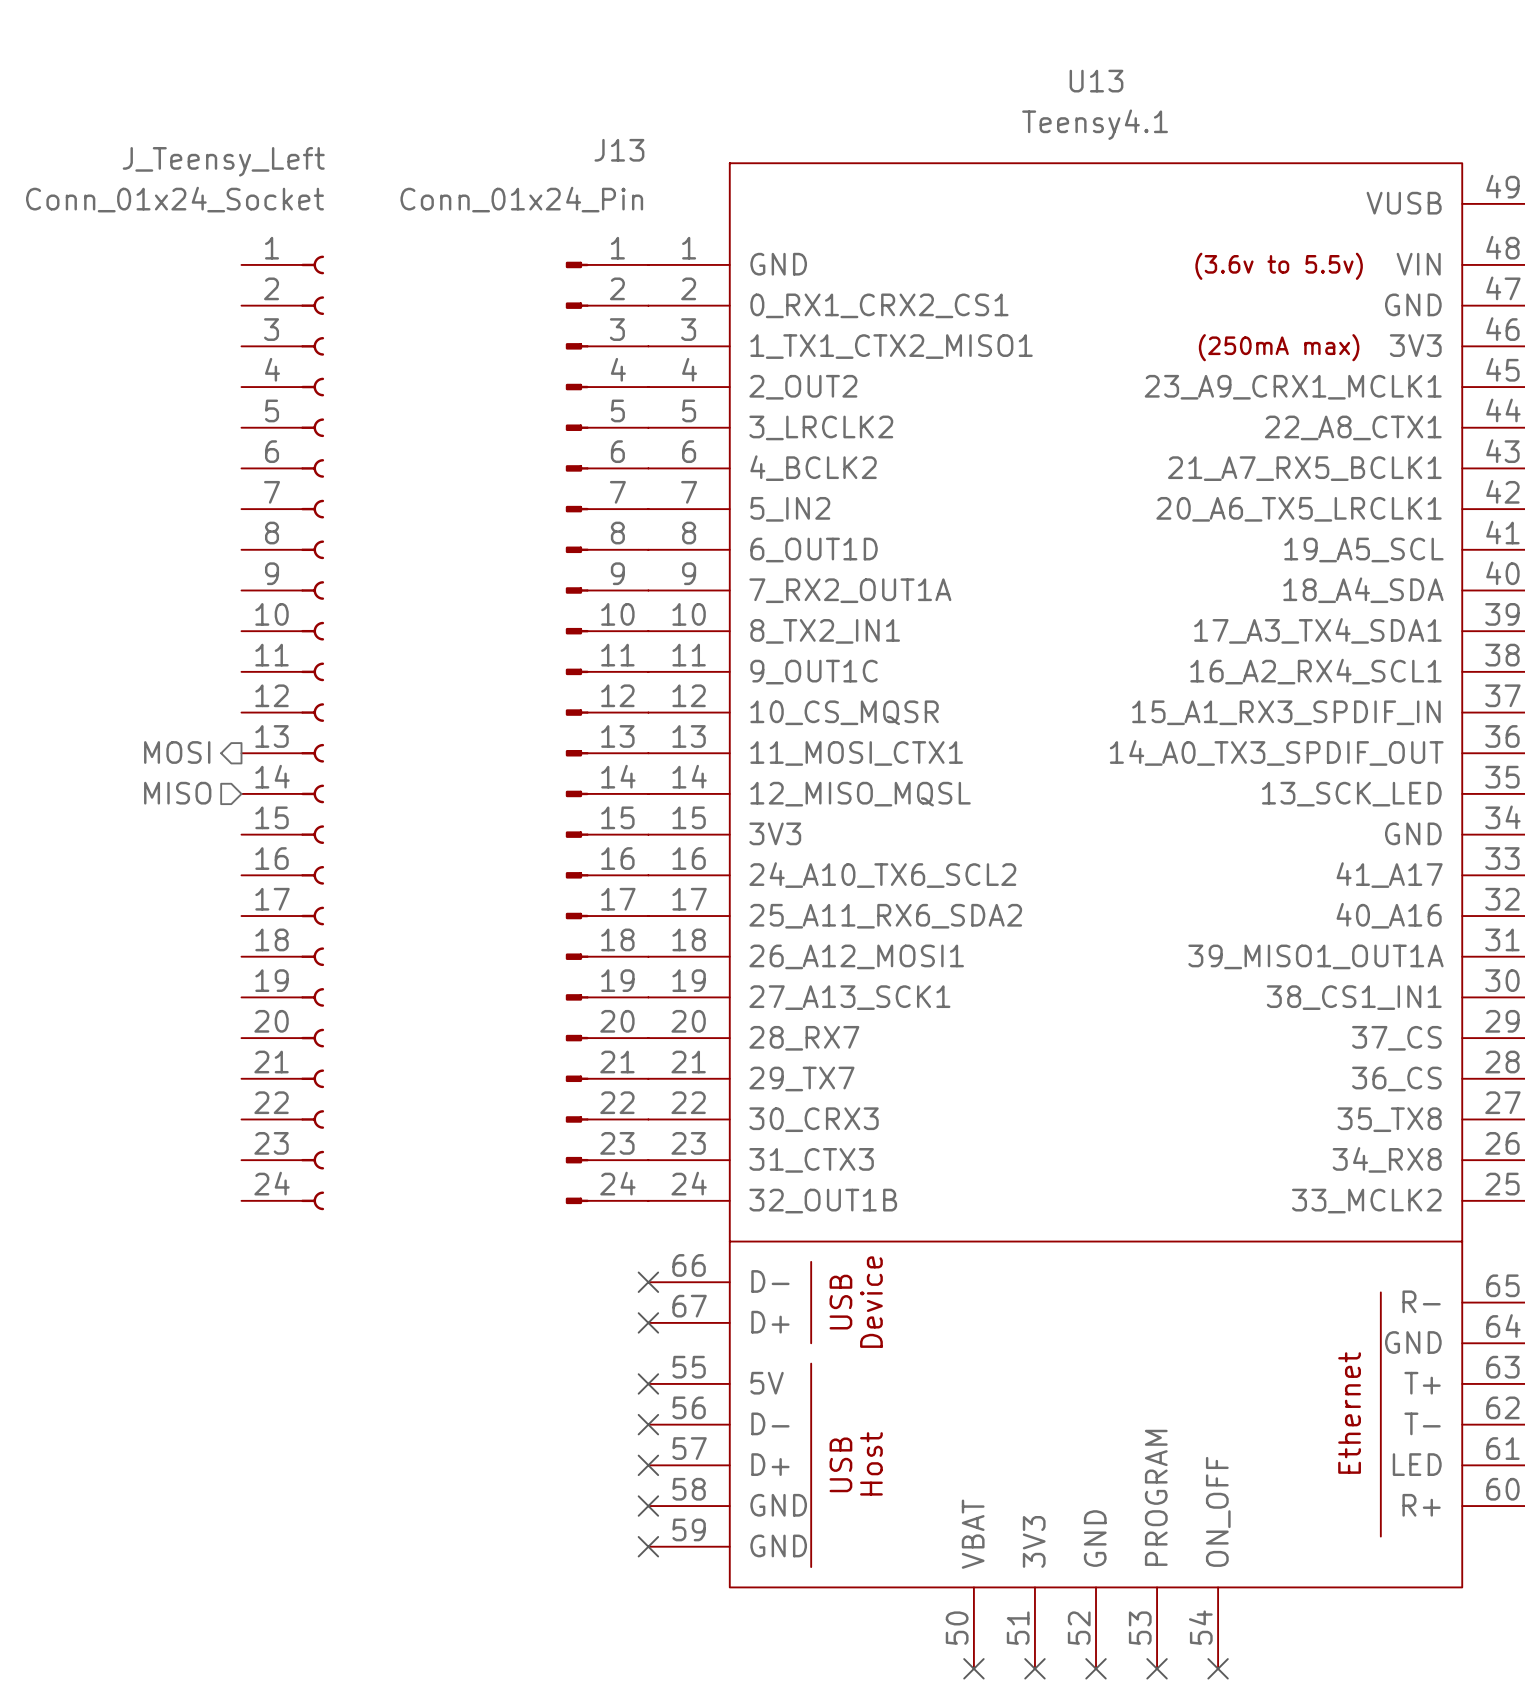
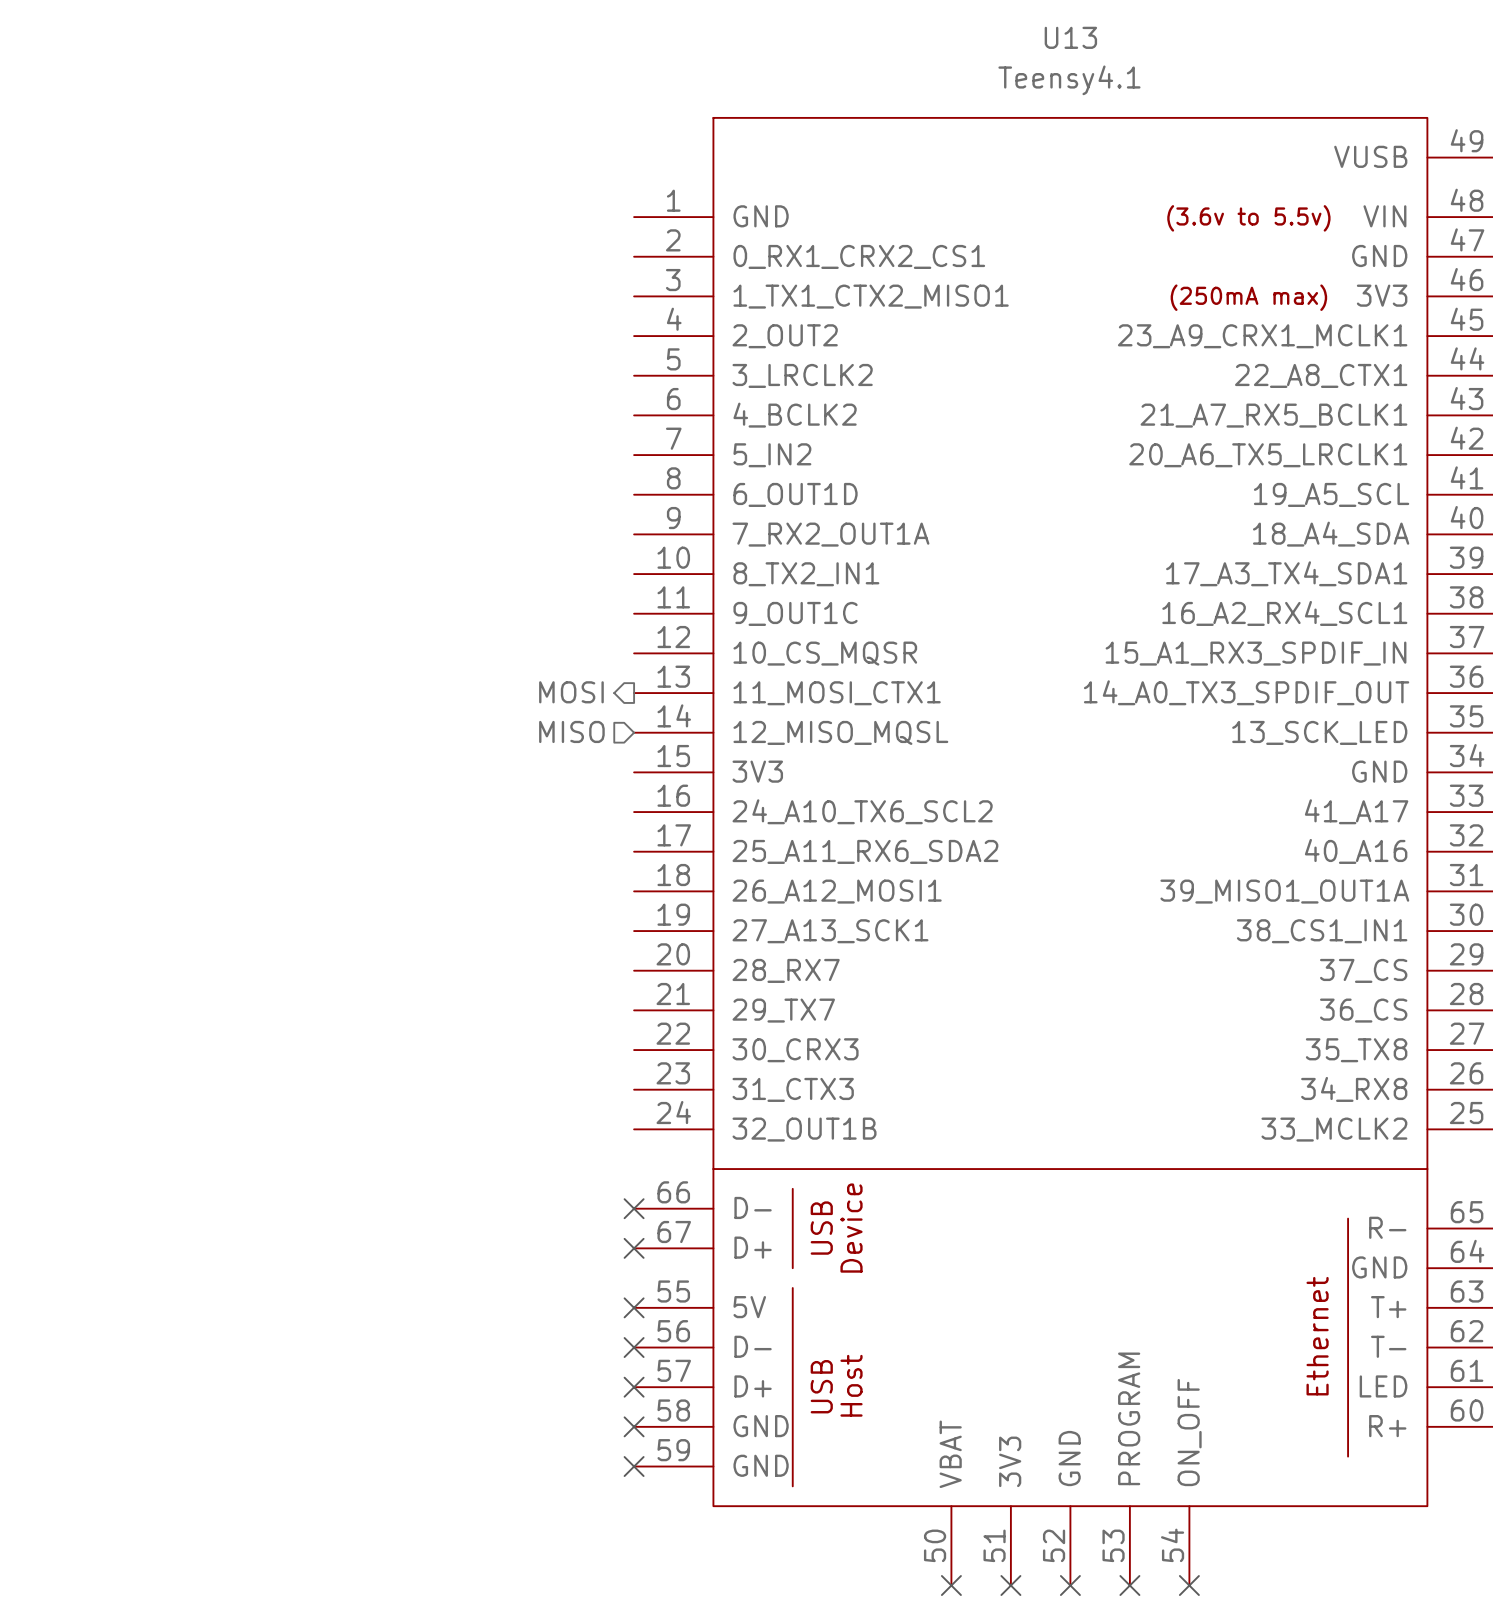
J_Teensy_Left: Conn_01x24_Socket (282, 732) -> none
J13: Conn_01x24_Pin (607, 732) -> none
hierarchical label: MOSI (177, 752) -> none
hierarchical label: none -> MOSI (571, 692)
hierarchical label: MISO (177, 793) -> none
hierarchical label: none -> MISO (571, 731)

